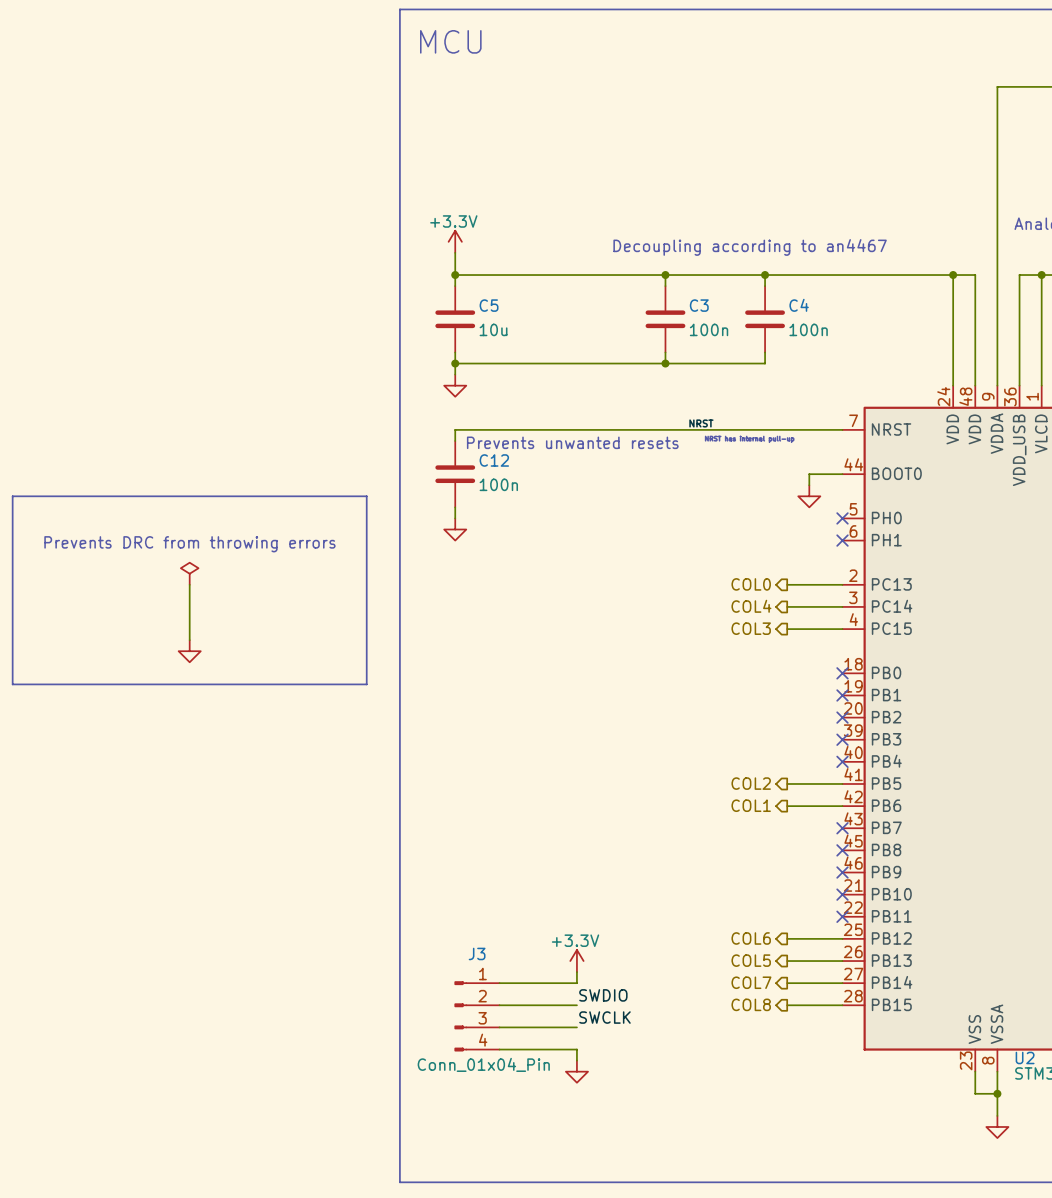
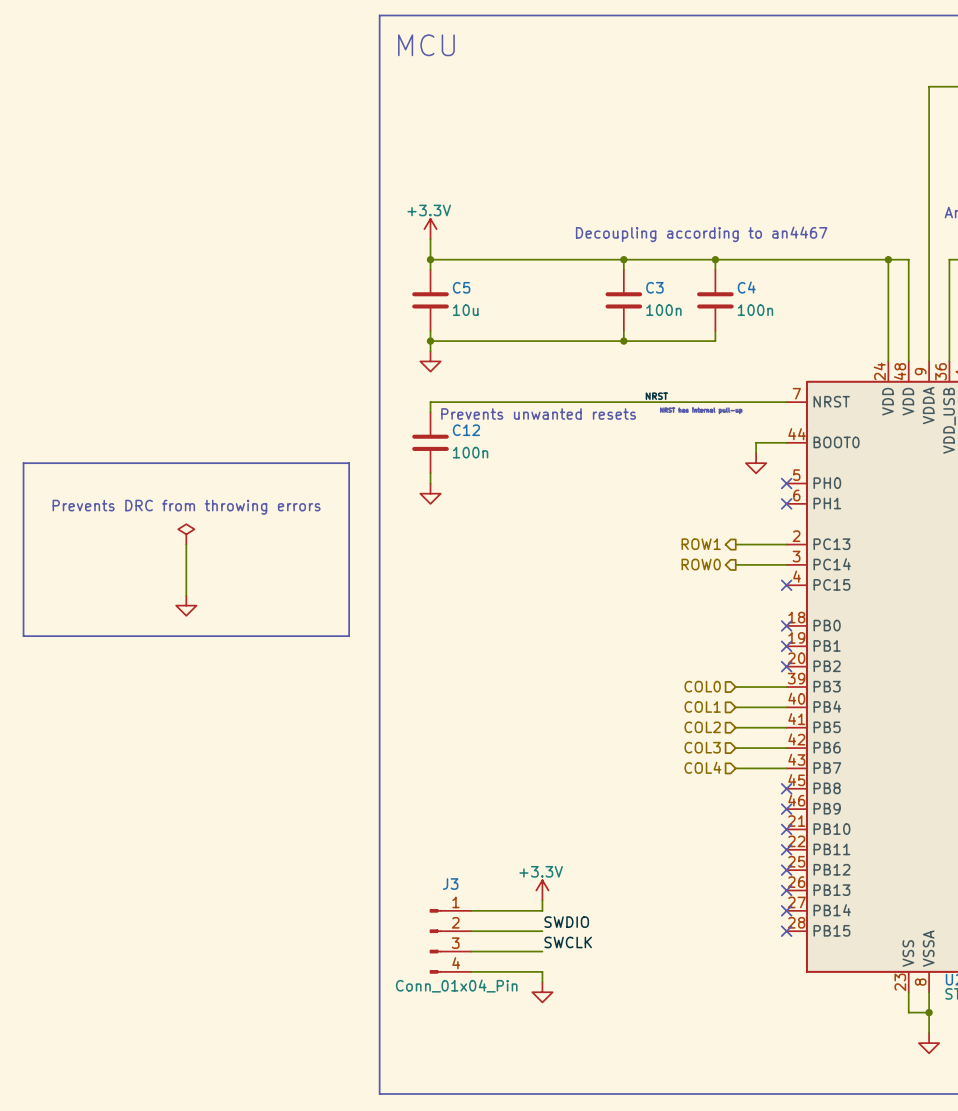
hierarchical label: COL0 (751, 584) -> ROW1 (701, 544)
hierarchical label: COL4 (751, 606) -> ROW0 (701, 564)
hierarchical label: COL3 (751, 628) -> none
wire: (787, 629) (842, 629) -> (735, 687) (786, 687)
no-connect mark: none -> (786, 585)
hierarchical label: none -> COL0 (702, 686)
no-connect mark: (842, 739) -> none
hierarchical label: none -> COL1 (702, 706)
no-connect mark: (842, 761) -> none
hierarchical label shape: output (751, 783) -> input (702, 727)
hierarchical label shape: output (751, 805) -> input (702, 747)
hierarchical label: COL1 (751, 805) -> COL3 (702, 747)
hierarchical label: none -> COL4 (702, 767)
no-connect mark: (842, 828) -> none
hierarchical label: COL6 (751, 938) -> none
wire: (787, 938) (842, 938) -> (735, 707) (786, 707)
no-connect mark: none -> (786, 870)
hierarchical label: COL5 (751, 960) -> none
wire: (787, 961) (842, 961) -> none
no-connect mark: none -> (786, 890)
hierarchical label: COL7 (751, 982) -> none
wire: (787, 983) (842, 983) -> none
no-connect mark: none -> (786, 910)
hierarchical label: COL8 (751, 1004) -> none
wire: (787, 1005) (842, 1005) -> (735, 768) (786, 768)
no-connect mark: none -> (786, 931)

